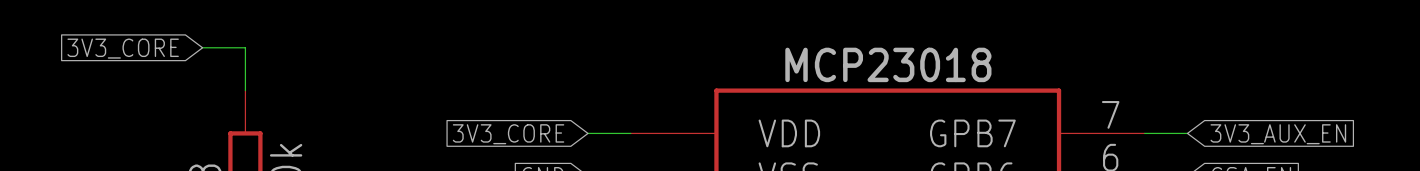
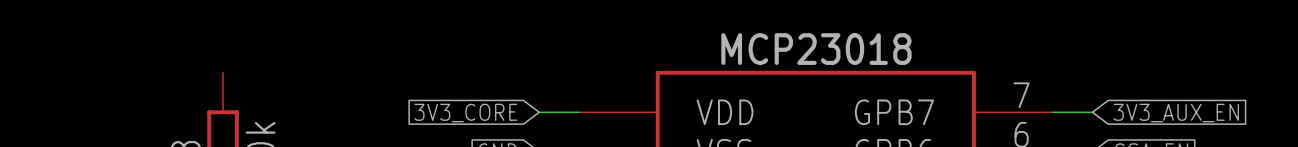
wire: (202, 47) (245, 47) (245, 90) -> none
global label: 3V3_CORE (123, 48) -> none

